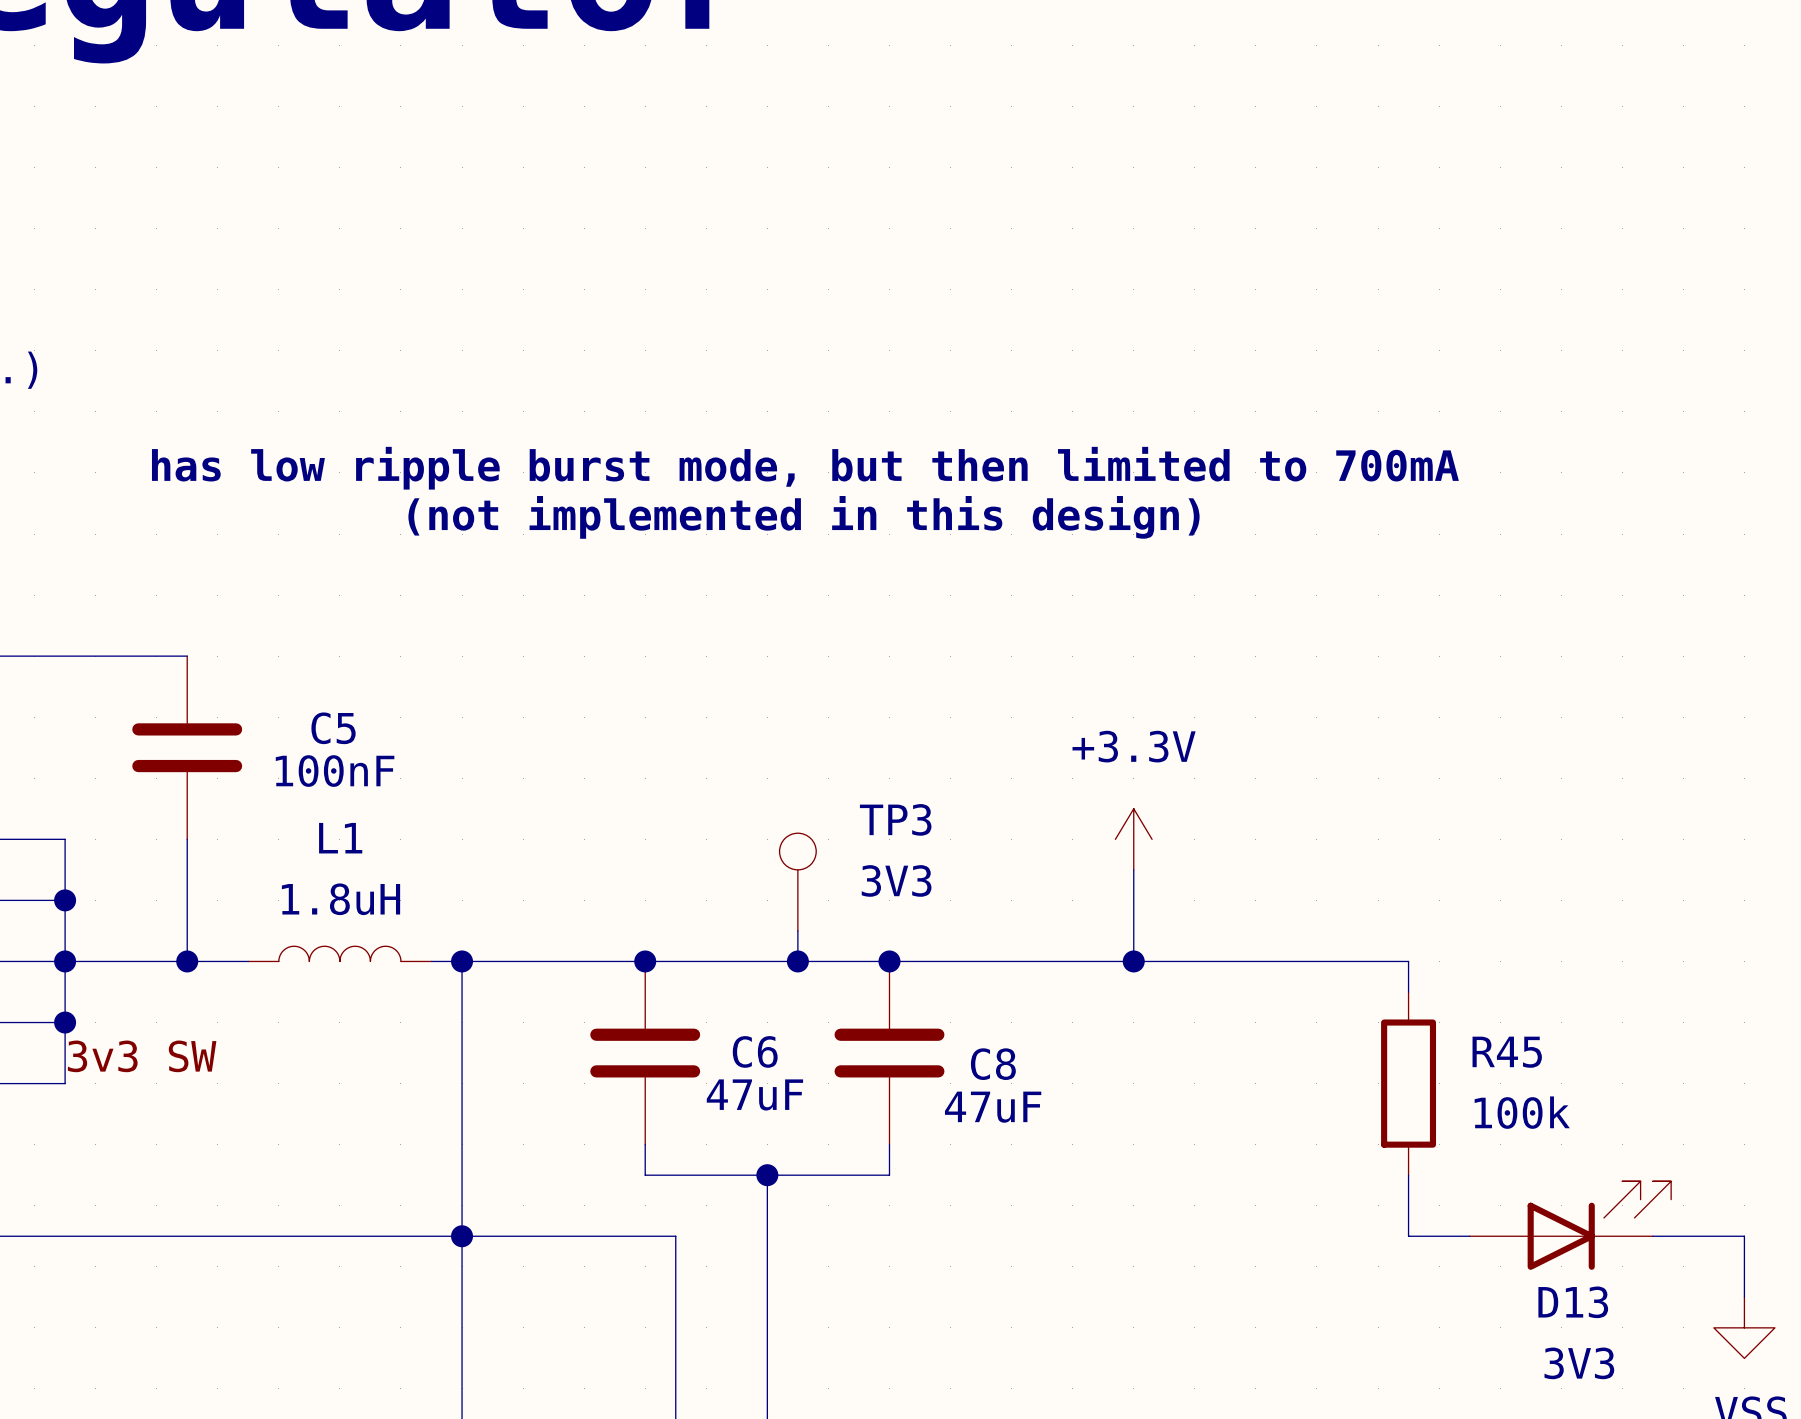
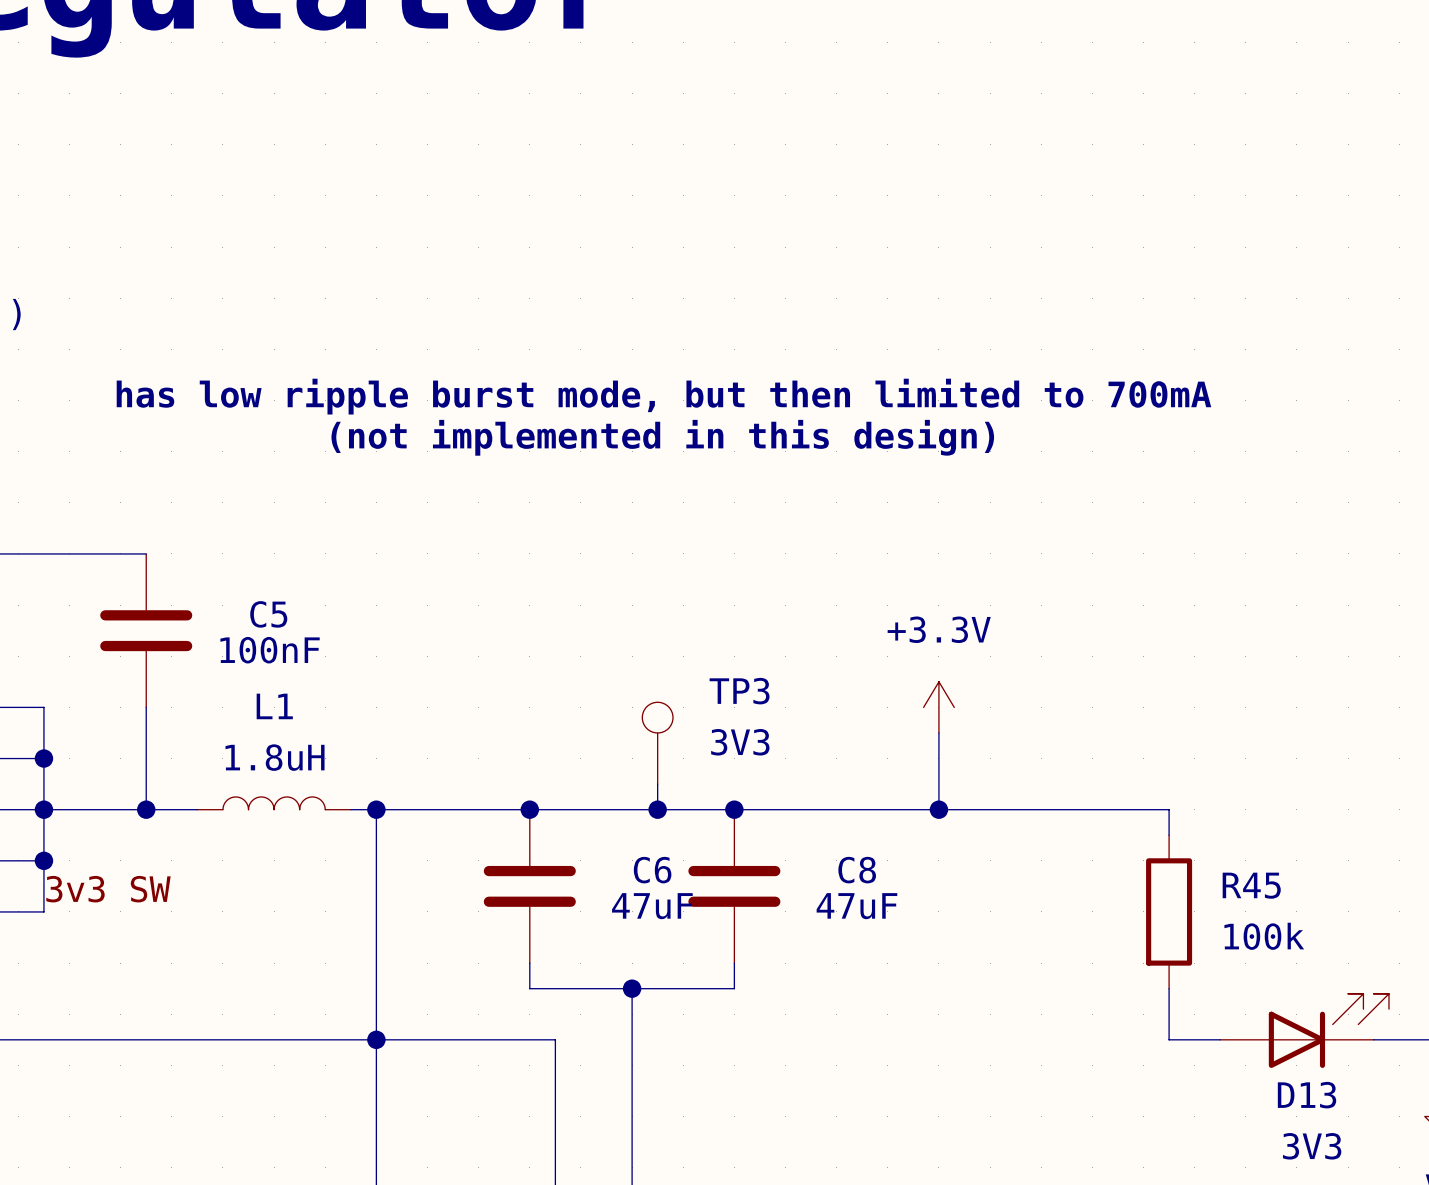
C6 name position: C6 (755, 1051) -> C6 (652, 870)
C8 name position: C8 (993, 1064) -> C8 (857, 870)
C6 value position: 47uF (754, 1094) -> 47uF (652, 906)
C8 value position: 47uF (993, 1107) -> 47uF (856, 906)

